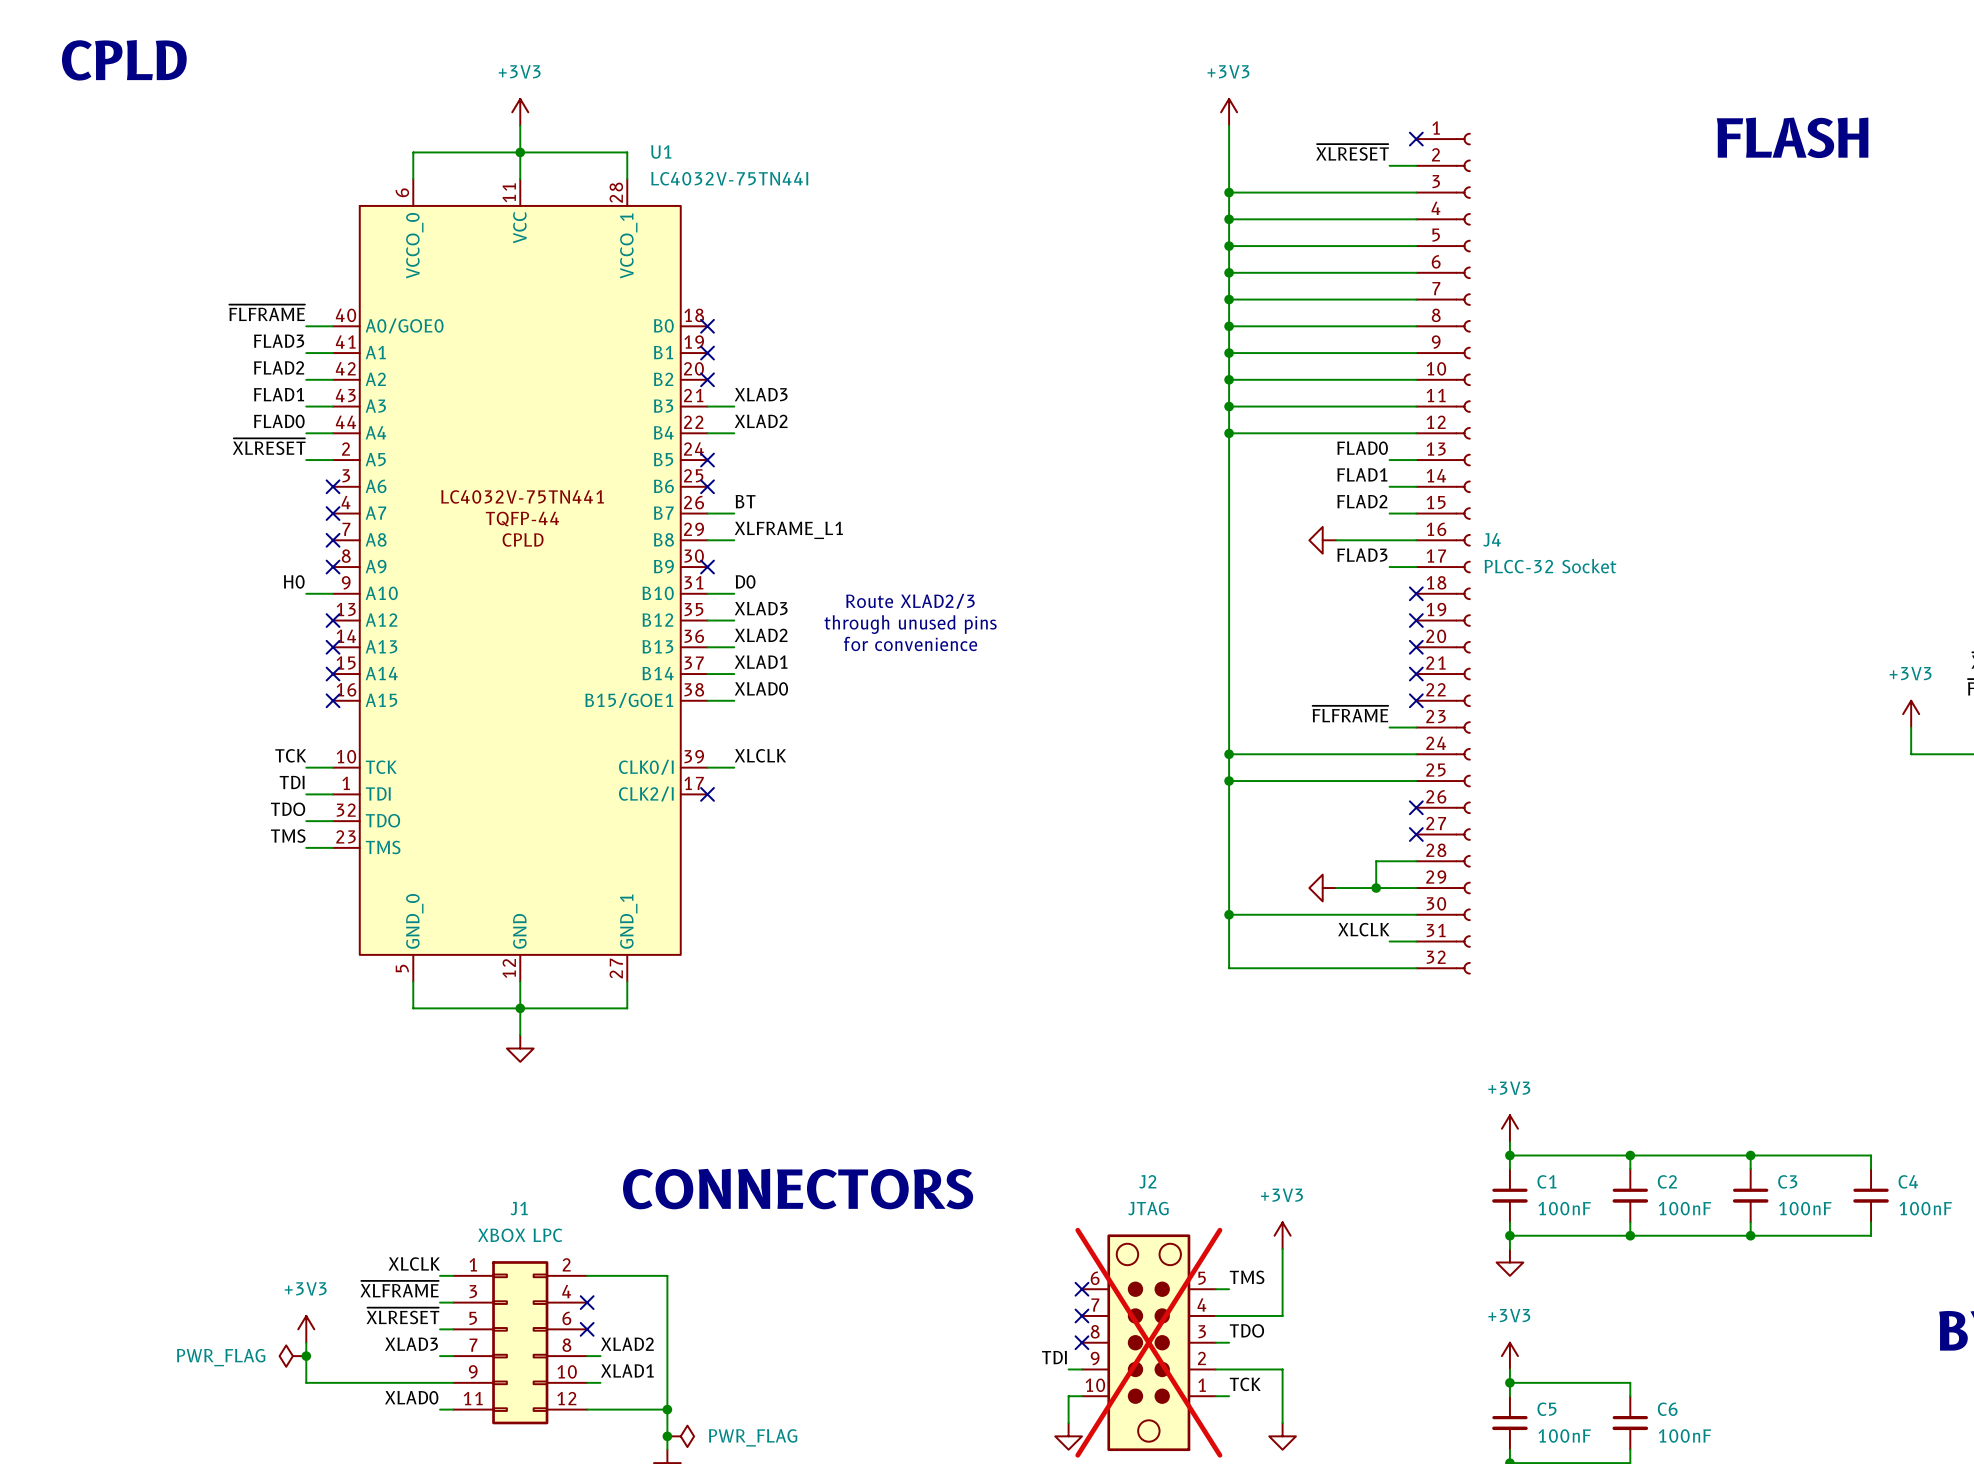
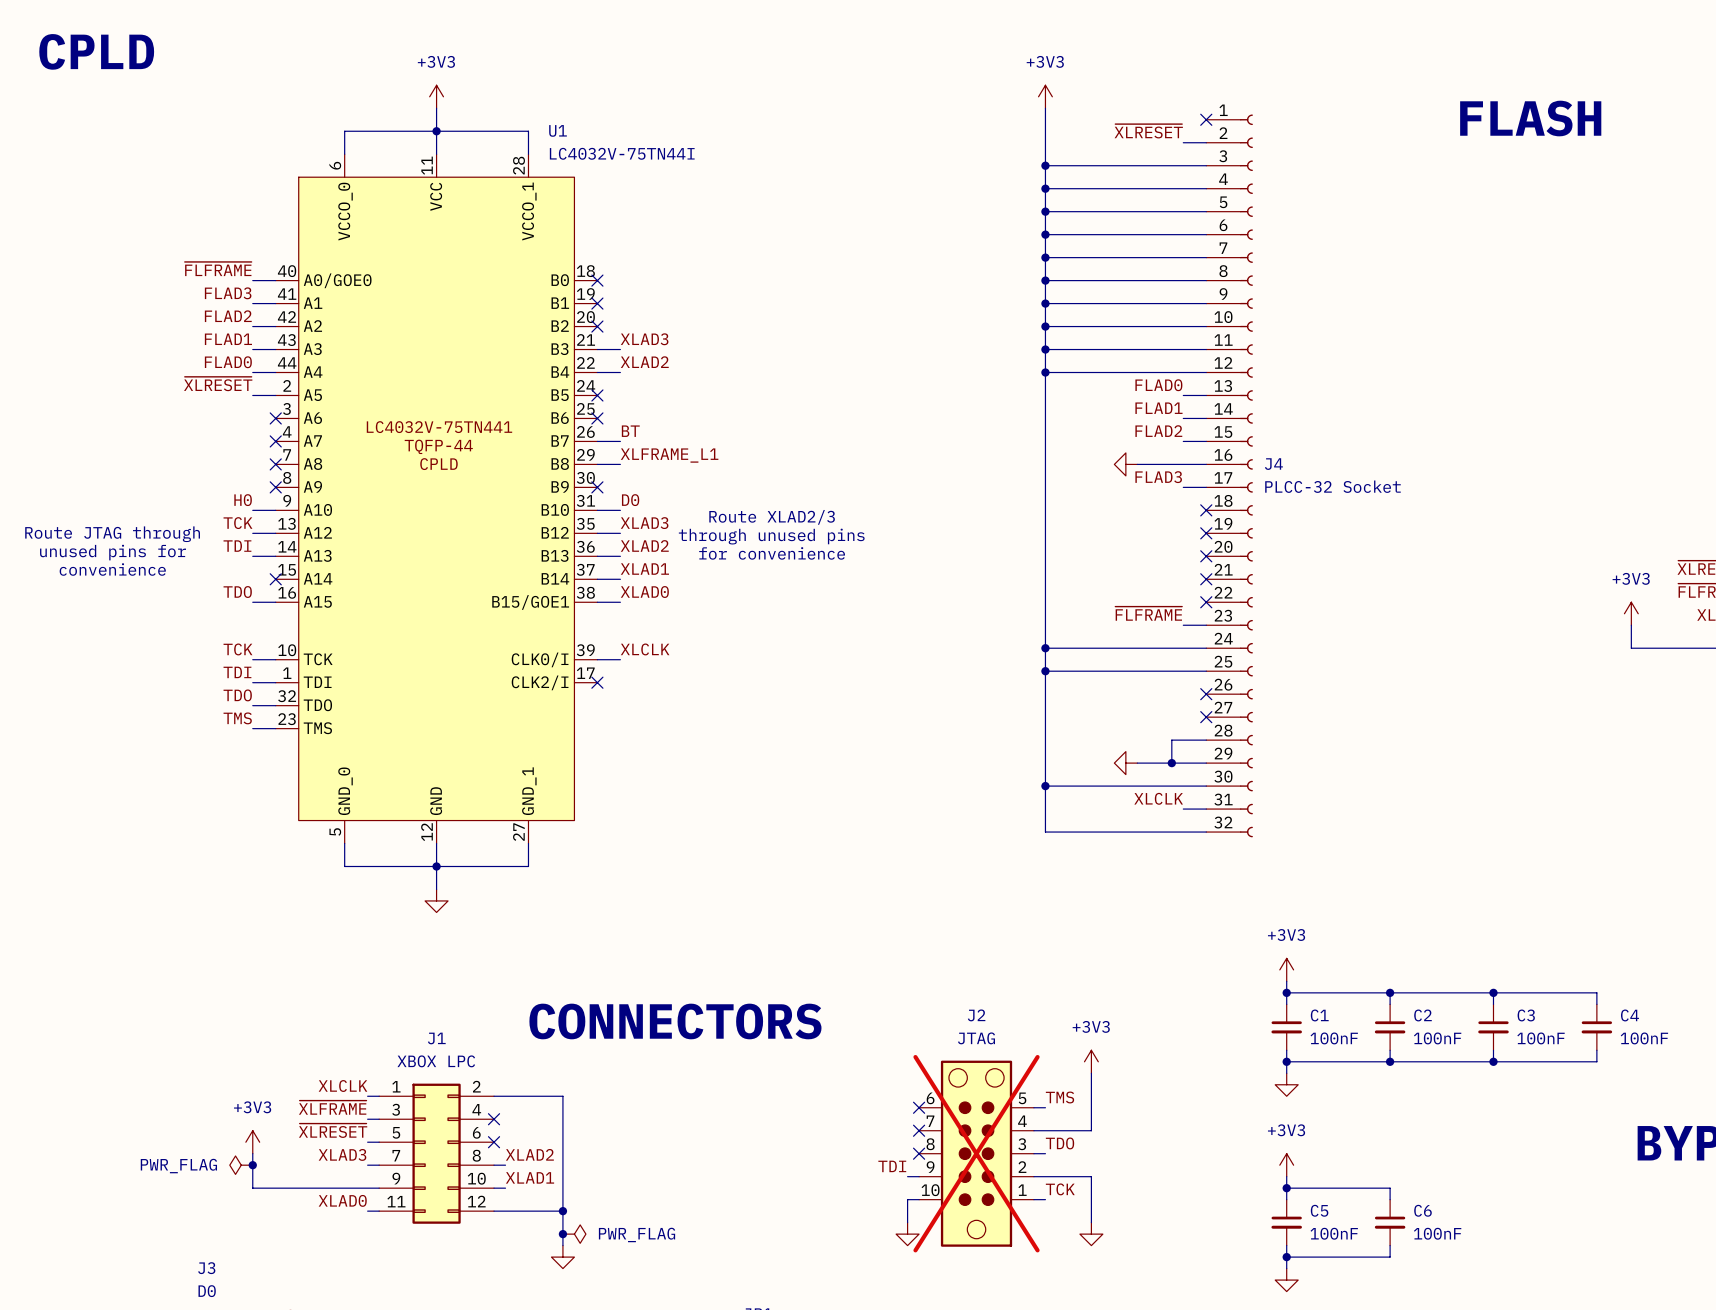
label: none -> TCK (237, 523)
wire: none -> (252, 533) (275, 533)
no-connect mark: (333, 620) -> none
text: none -> Route JTAG through (112, 534)
label: none -> TDI (237, 546)
text: none -> unused pins for (113, 552)
wire: none -> (252, 556) (275, 556)
no-connect mark: (333, 647) -> none
text: none -> convenience (112, 569)
label: none -> TDO (237, 592)
wire: none -> (252, 602) (275, 602)
no-connect mark: (333, 700) -> none

